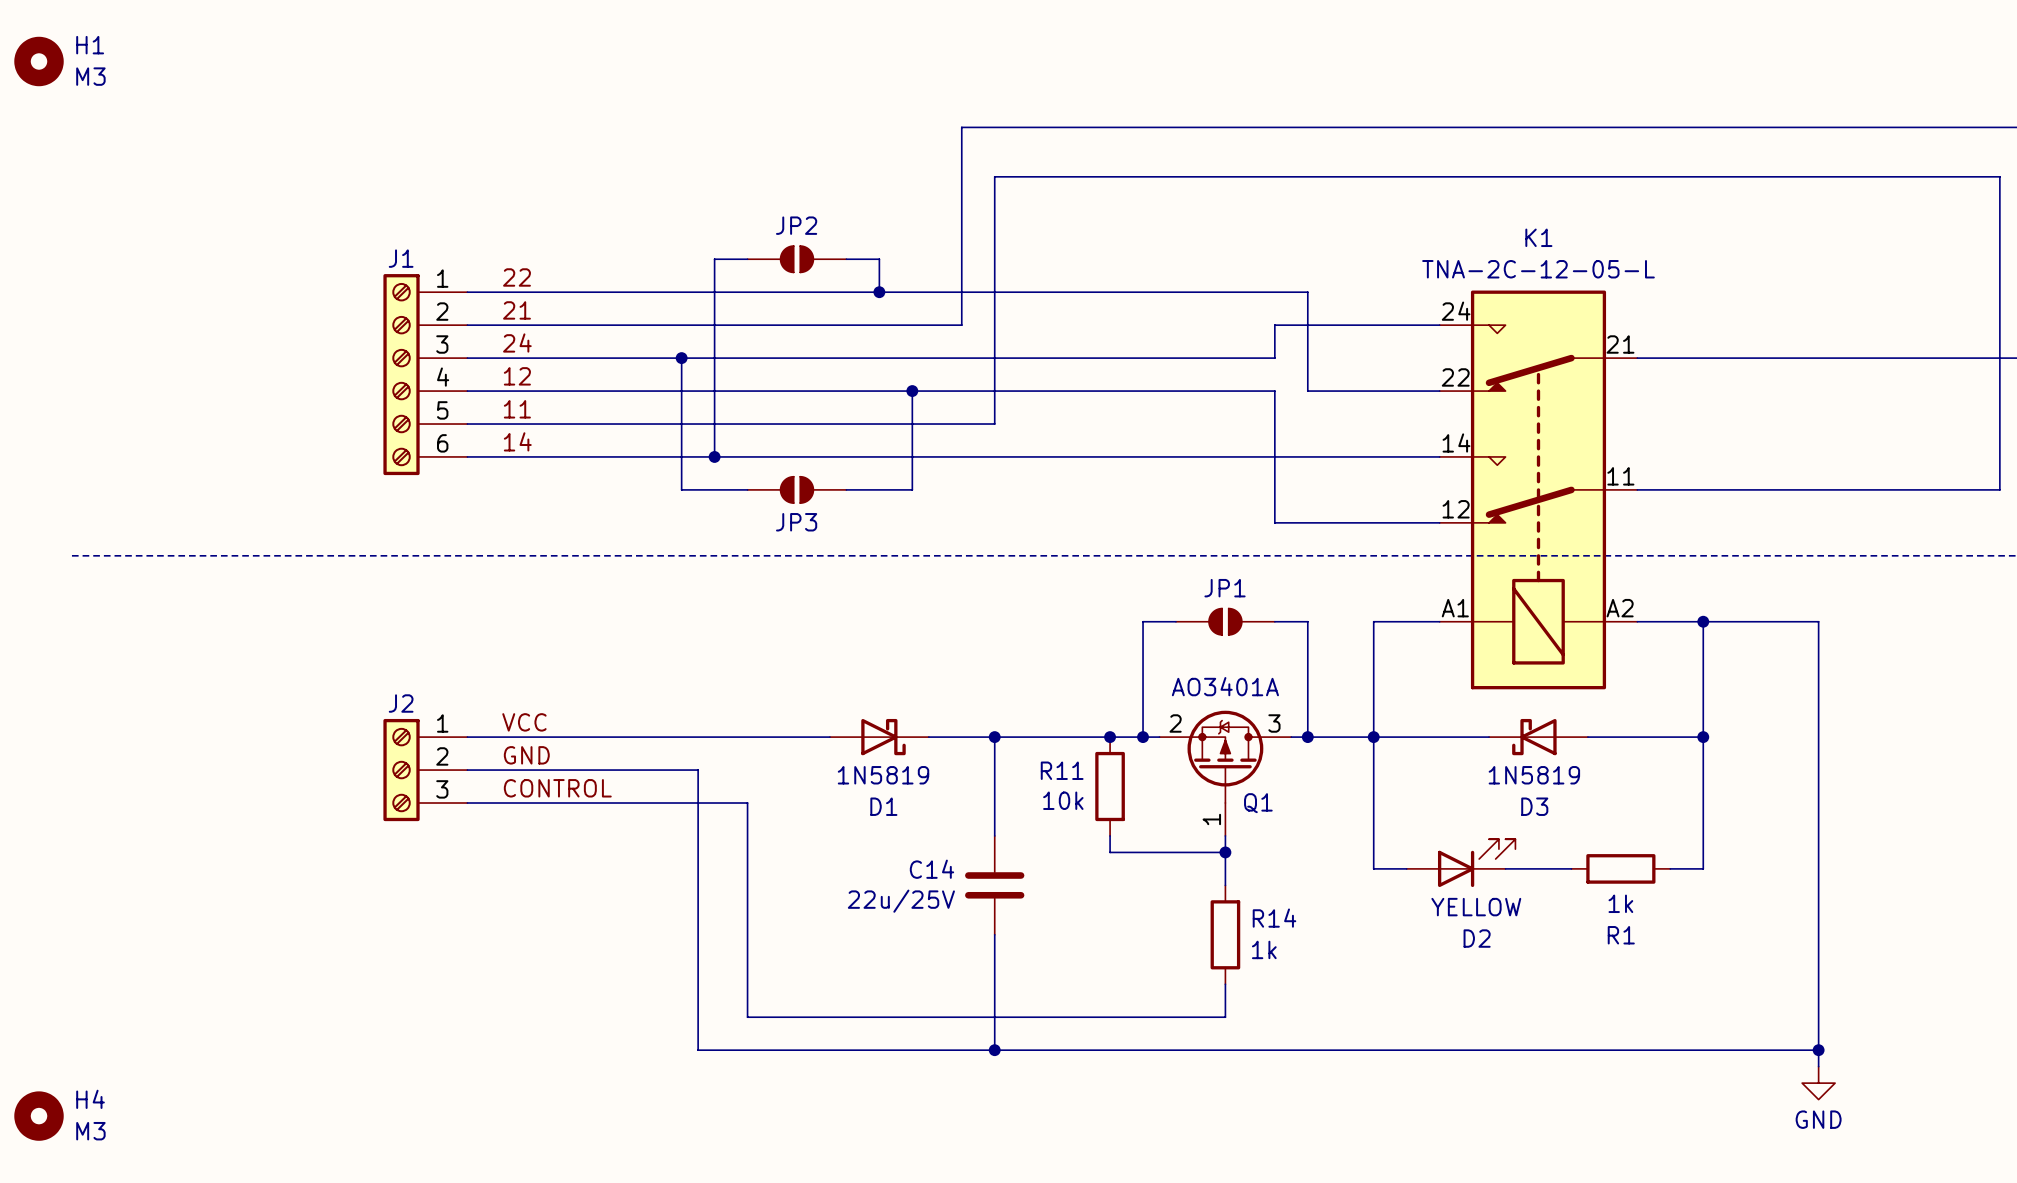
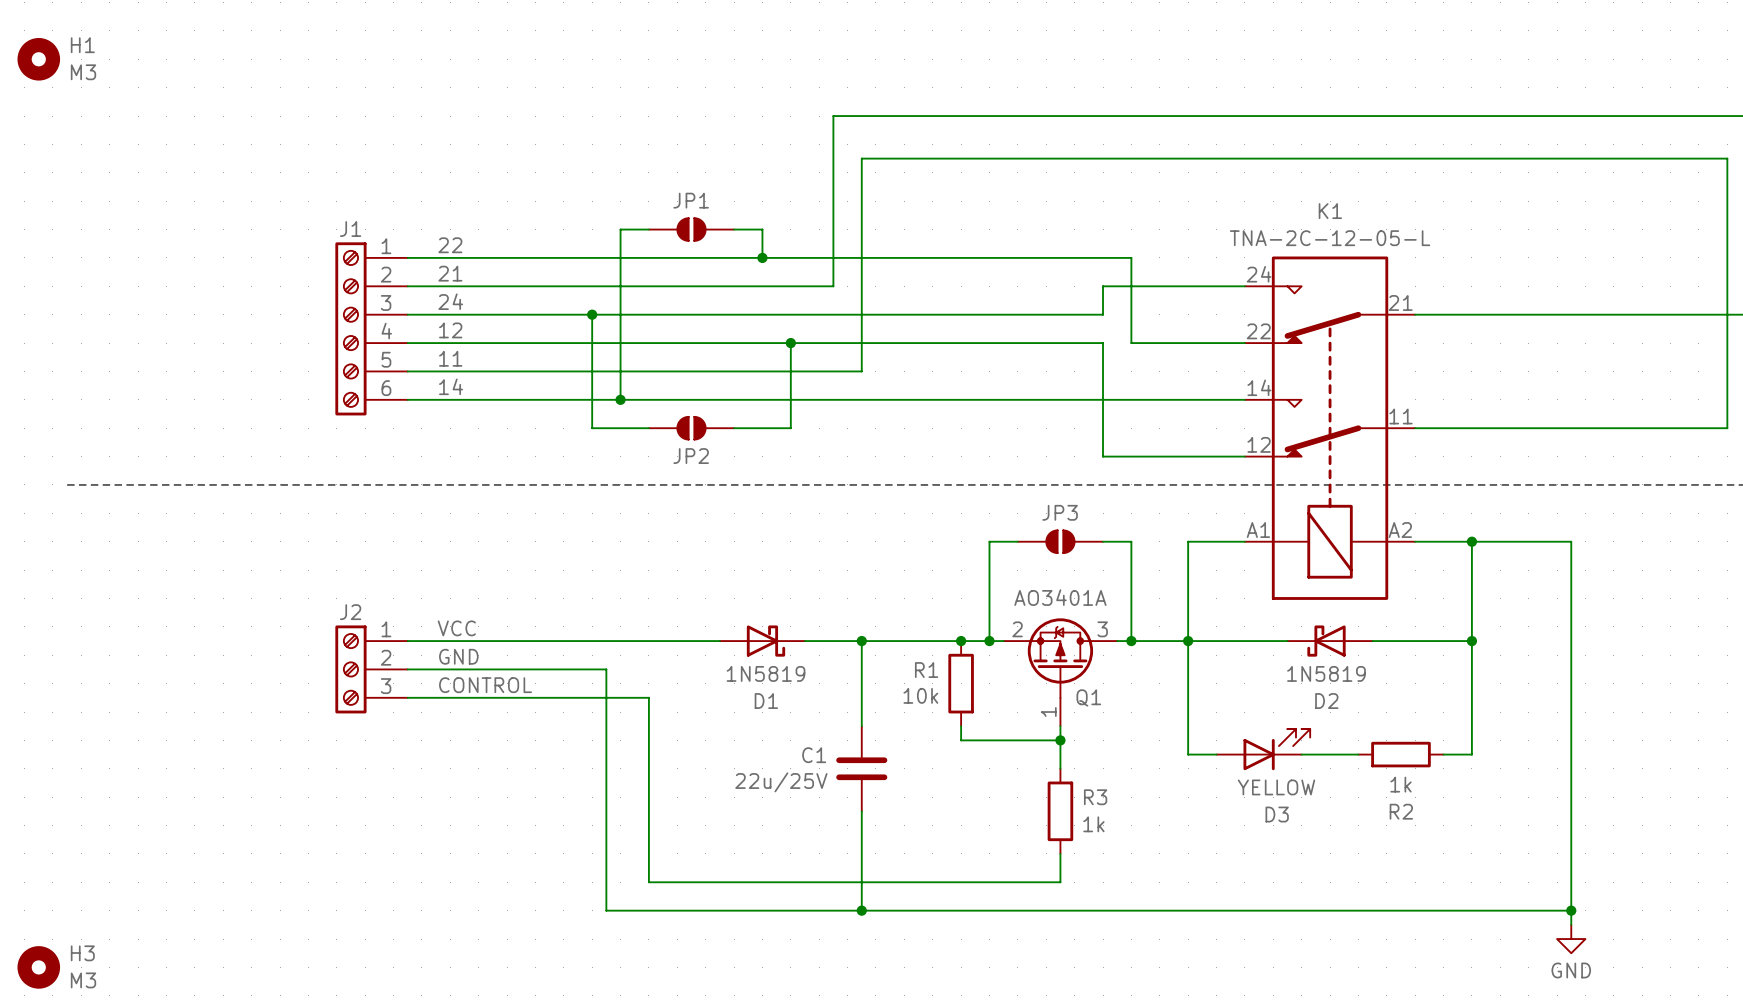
JP2 name: JP2 (796, 225) -> JP1 (691, 200)
JP3 name: JP3 (796, 522) -> JP2 (691, 456)
JP1 name: JP1 (1225, 588) -> JP3 (1060, 512)
R11 name: R11 (1062, 770) -> R1 (926, 670)
D3 name: D3 (1534, 806) -> D2 (1326, 701)
C14 name: C14 (931, 869) -> C1 (814, 755)
R14 name: R14 (1274, 918) -> R3 (1095, 797)
R1 name: R1 (1621, 935) -> R2 (1401, 811)
D2 name: D2 (1477, 938) -> D3 (1277, 814)
H4 name: H4 (90, 1099) -> H3 (82, 953)

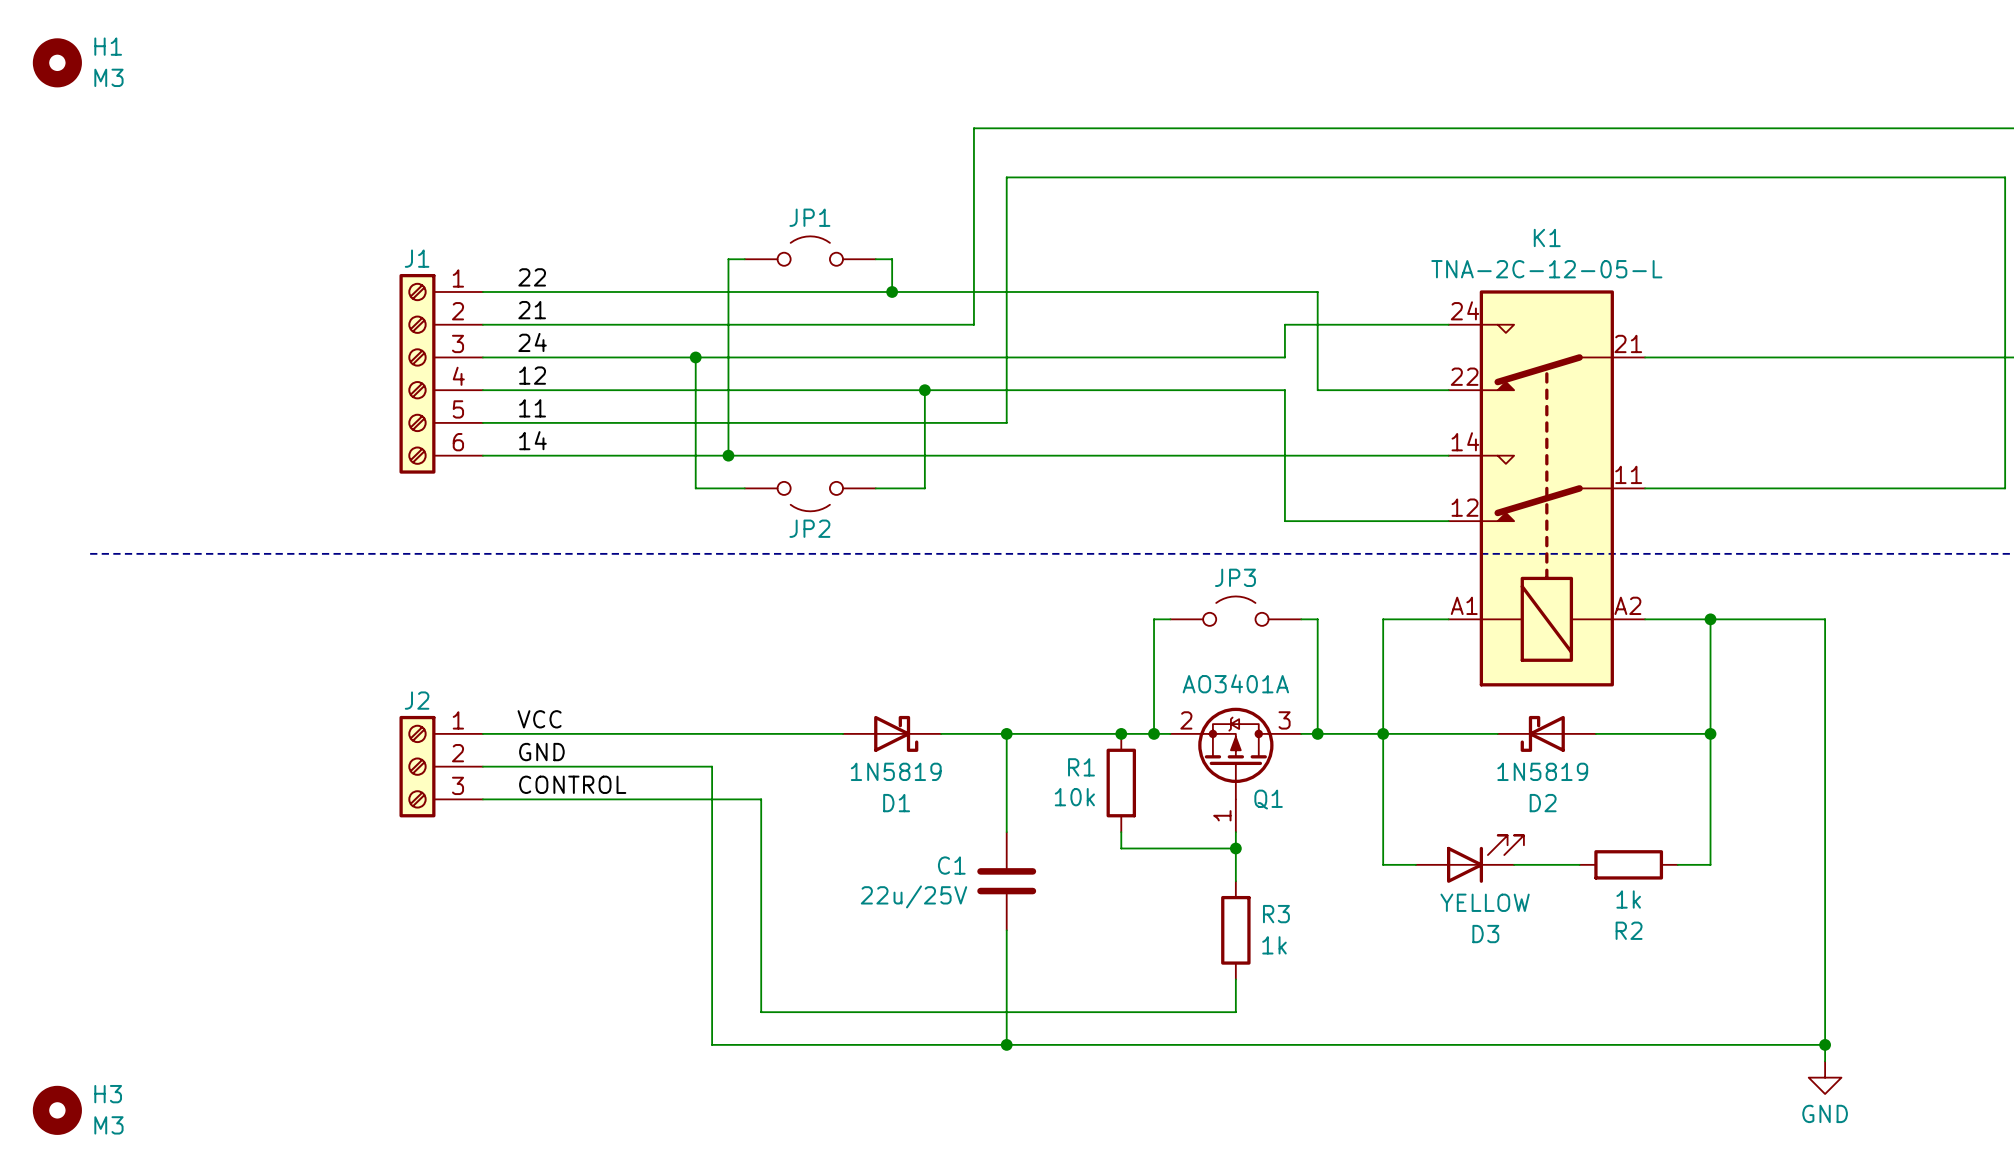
JP1 symbol: [648, 218, 735, 241] -> [744, 236, 876, 266]
JP2 symbol: [648, 416, 735, 440] -> [744, 481, 876, 512]
JP3 symbol: [1017, 530, 1104, 554] -> [1170, 596, 1302, 626]

